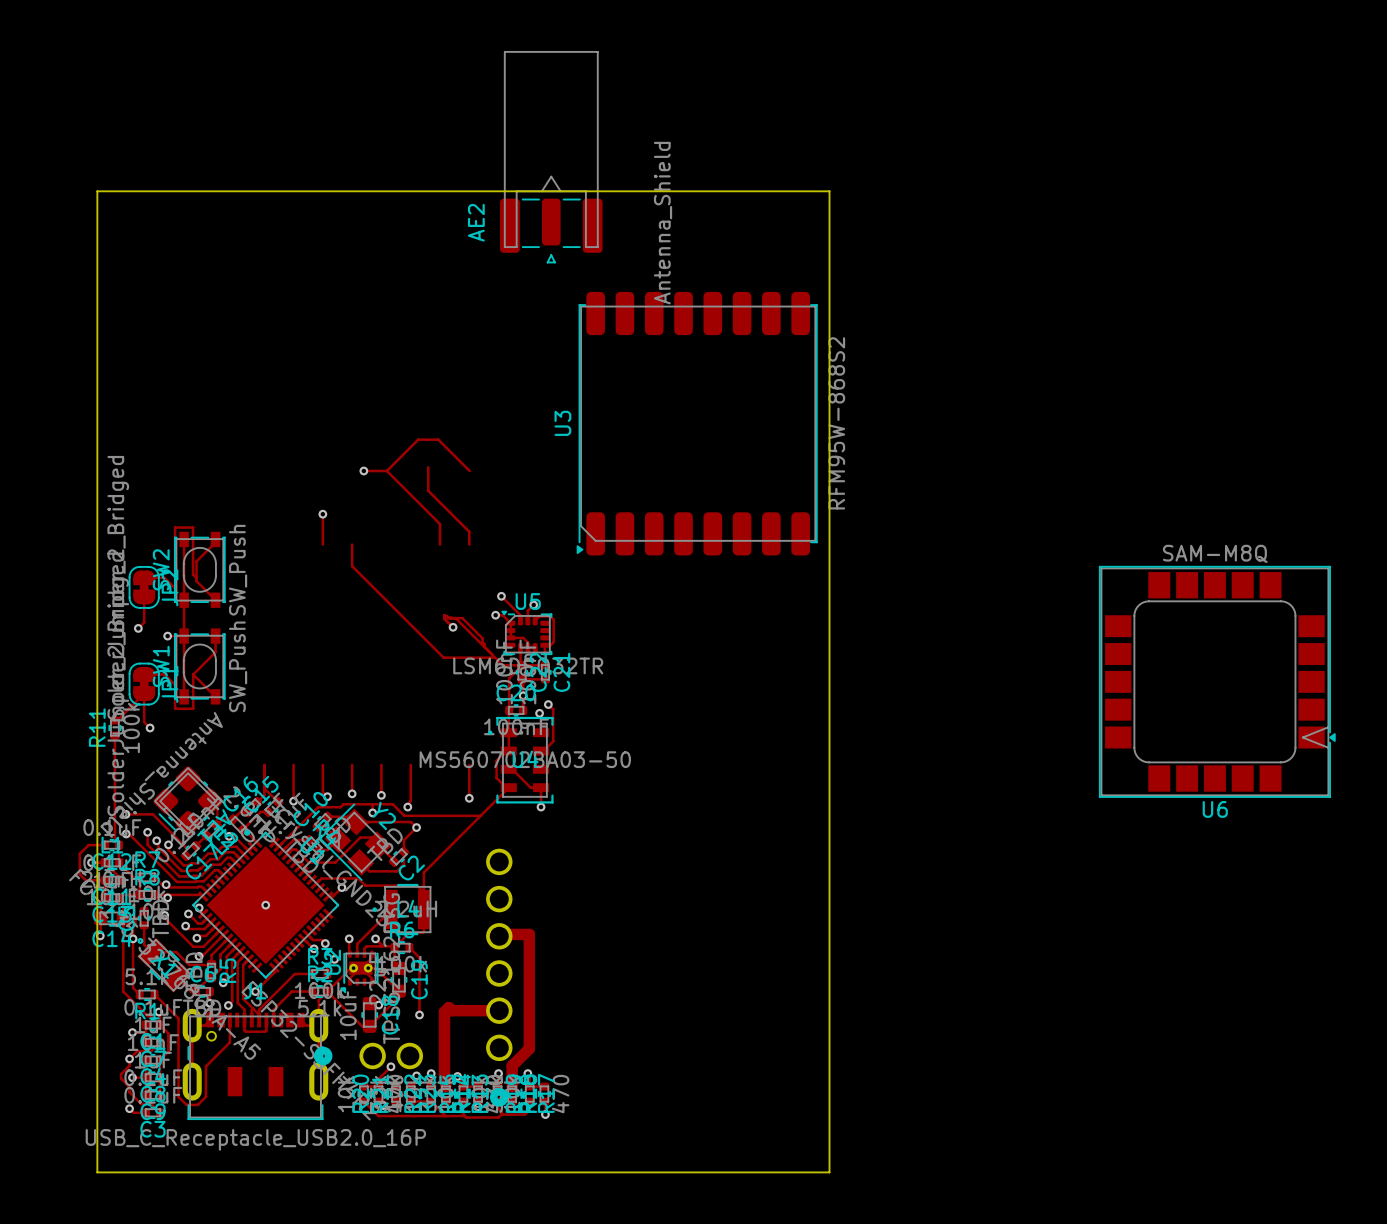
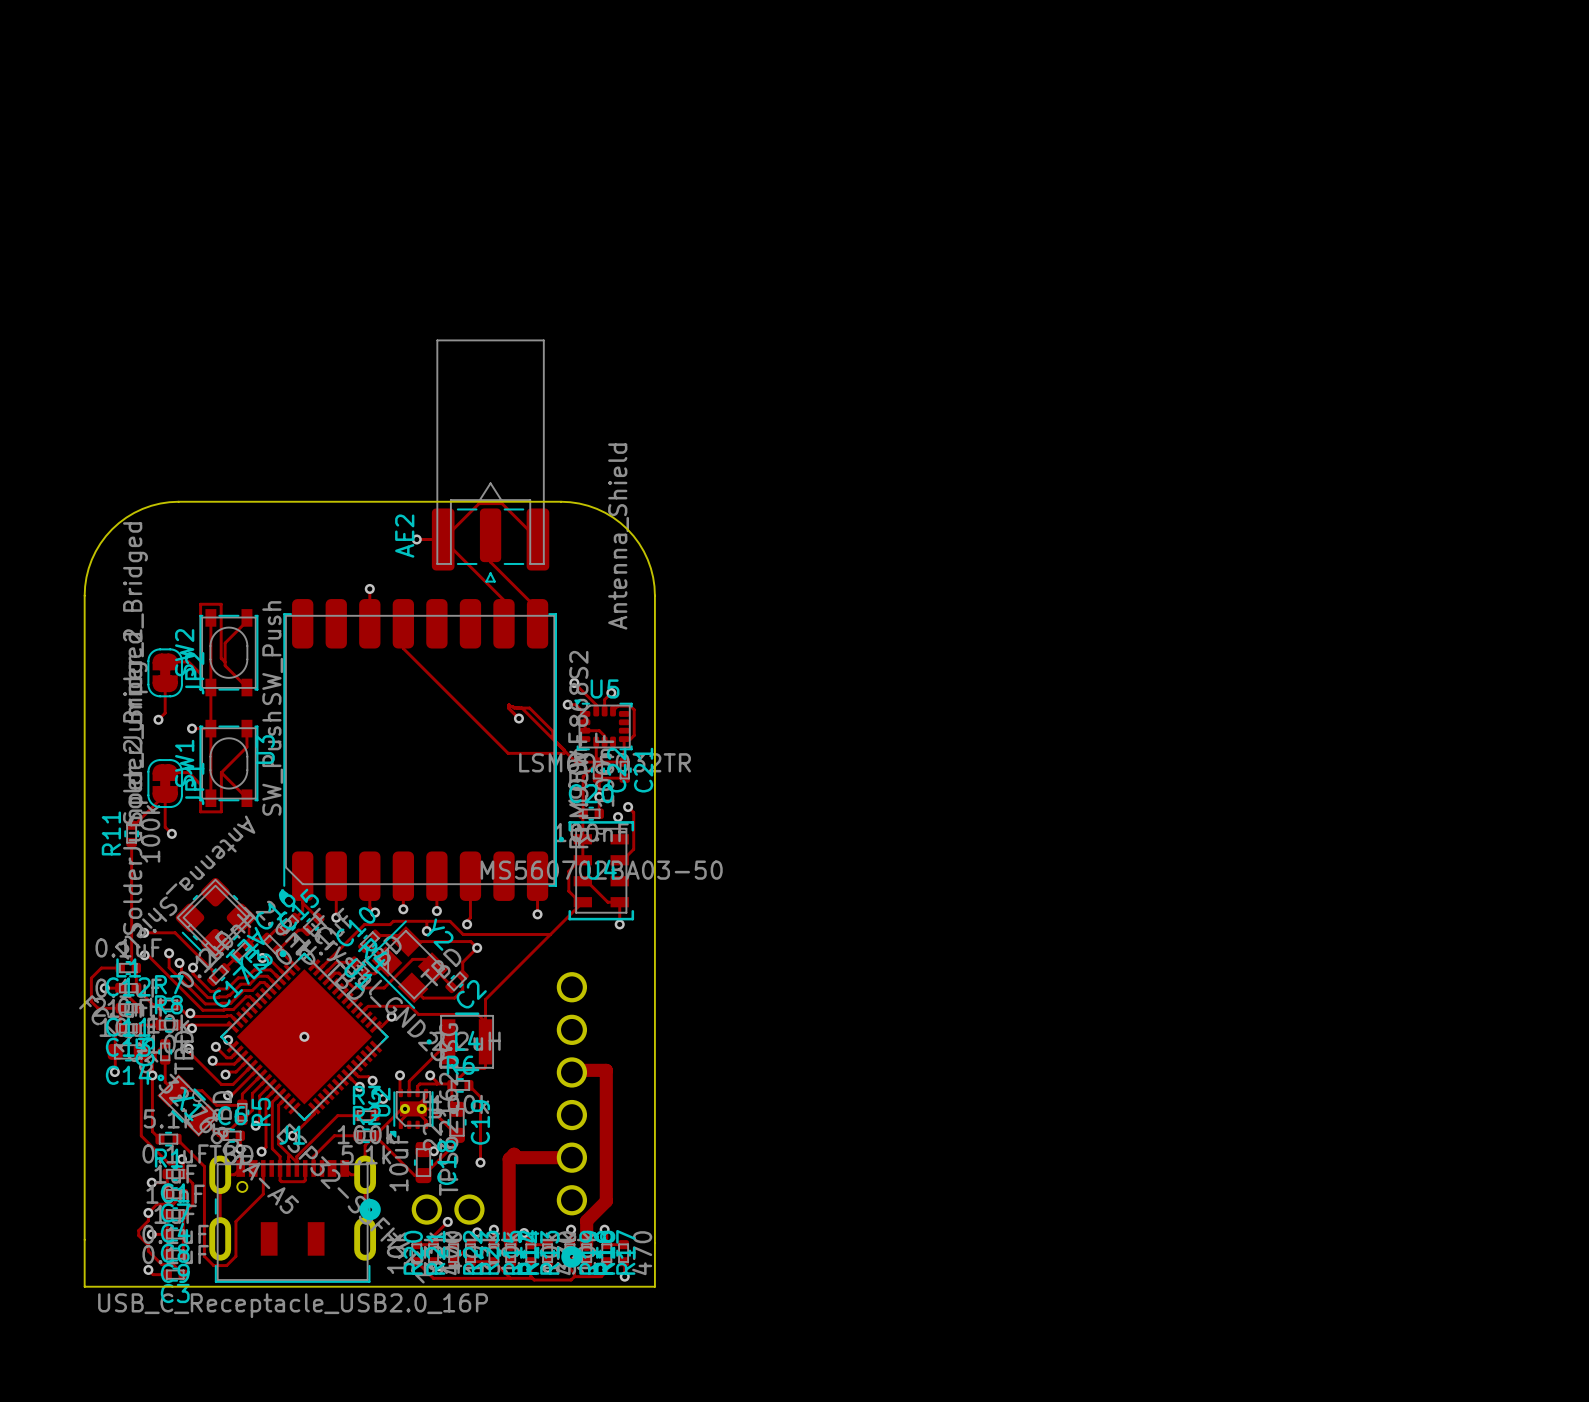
AE2 position: (551, 157) -> (490, 461)
board edge: (97, 191) (829, 191) (829, 1172) (97, 1172) (97, 191) -> none
U3 position: (697, 423) -> (418, 749)
board edge: none -> (178, 501) (570, 502) (588, 505) (605, 512) (620, 523) (639, 543) (650, 568) (654, 595) (654, 1286) (84, 1286) (85, 586) (88, 568) (95, 551) (105, 536) (119, 523) (134, 512) (151, 505) (178, 501)
U6: SAM-M8Q (1217, 681) -> none

